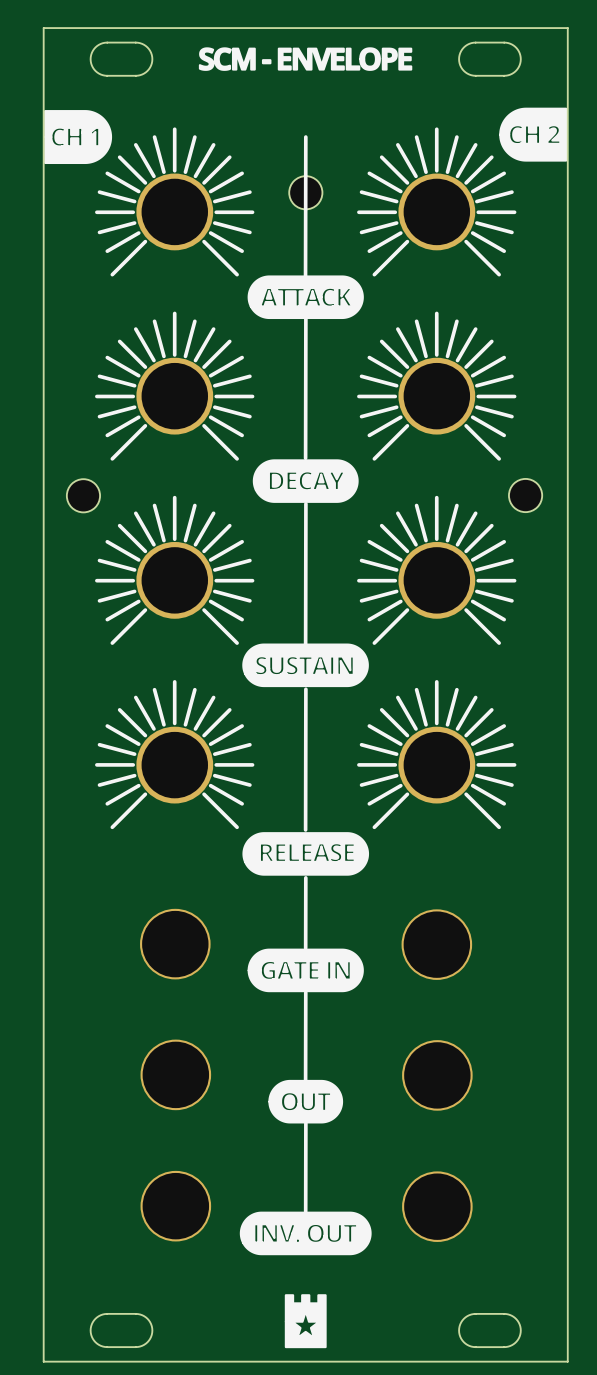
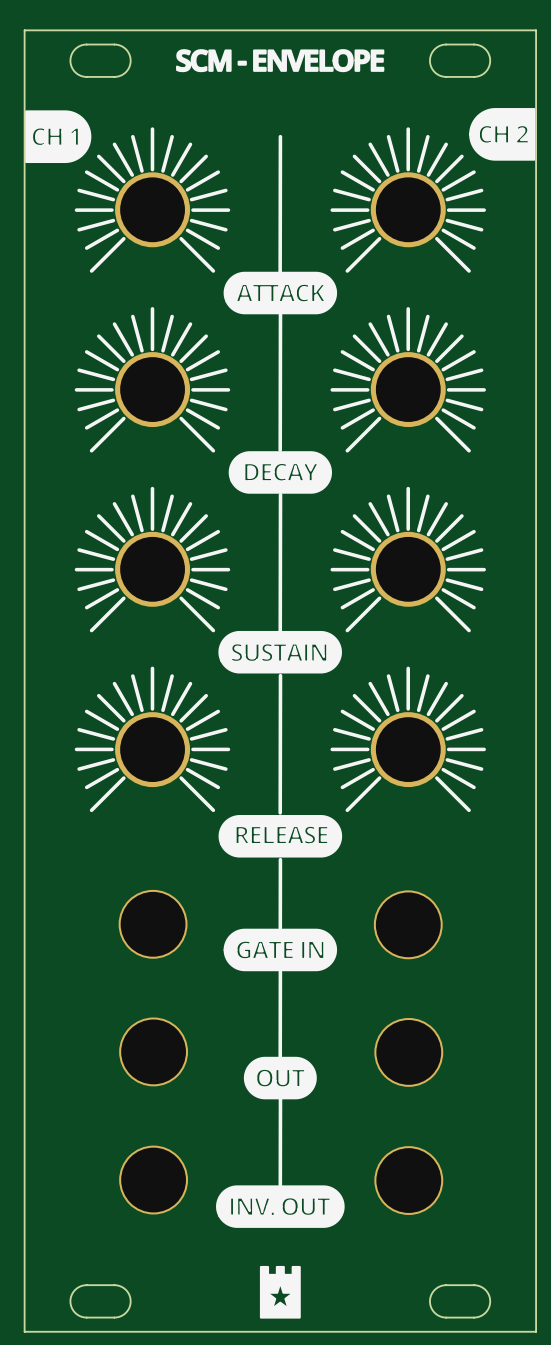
part: (305, 192) -> none
part: (83, 495) -> none
part: (525, 495) -> none

